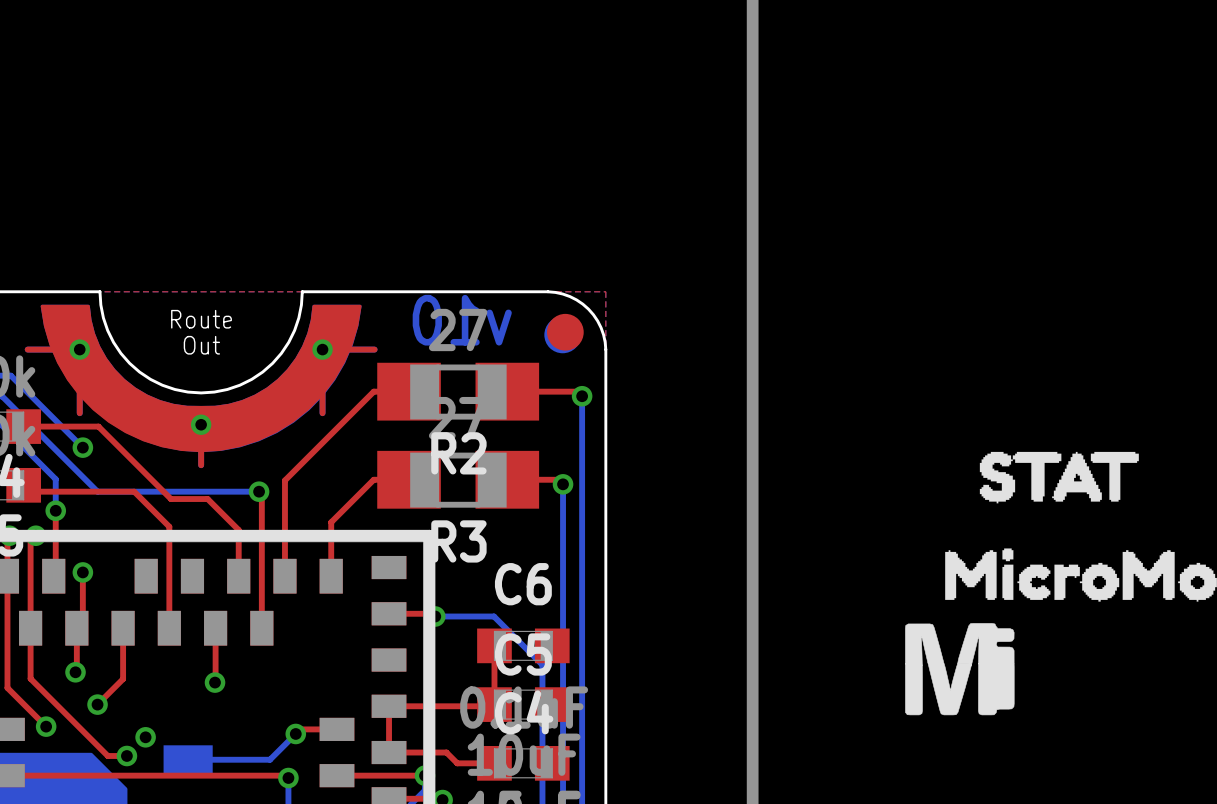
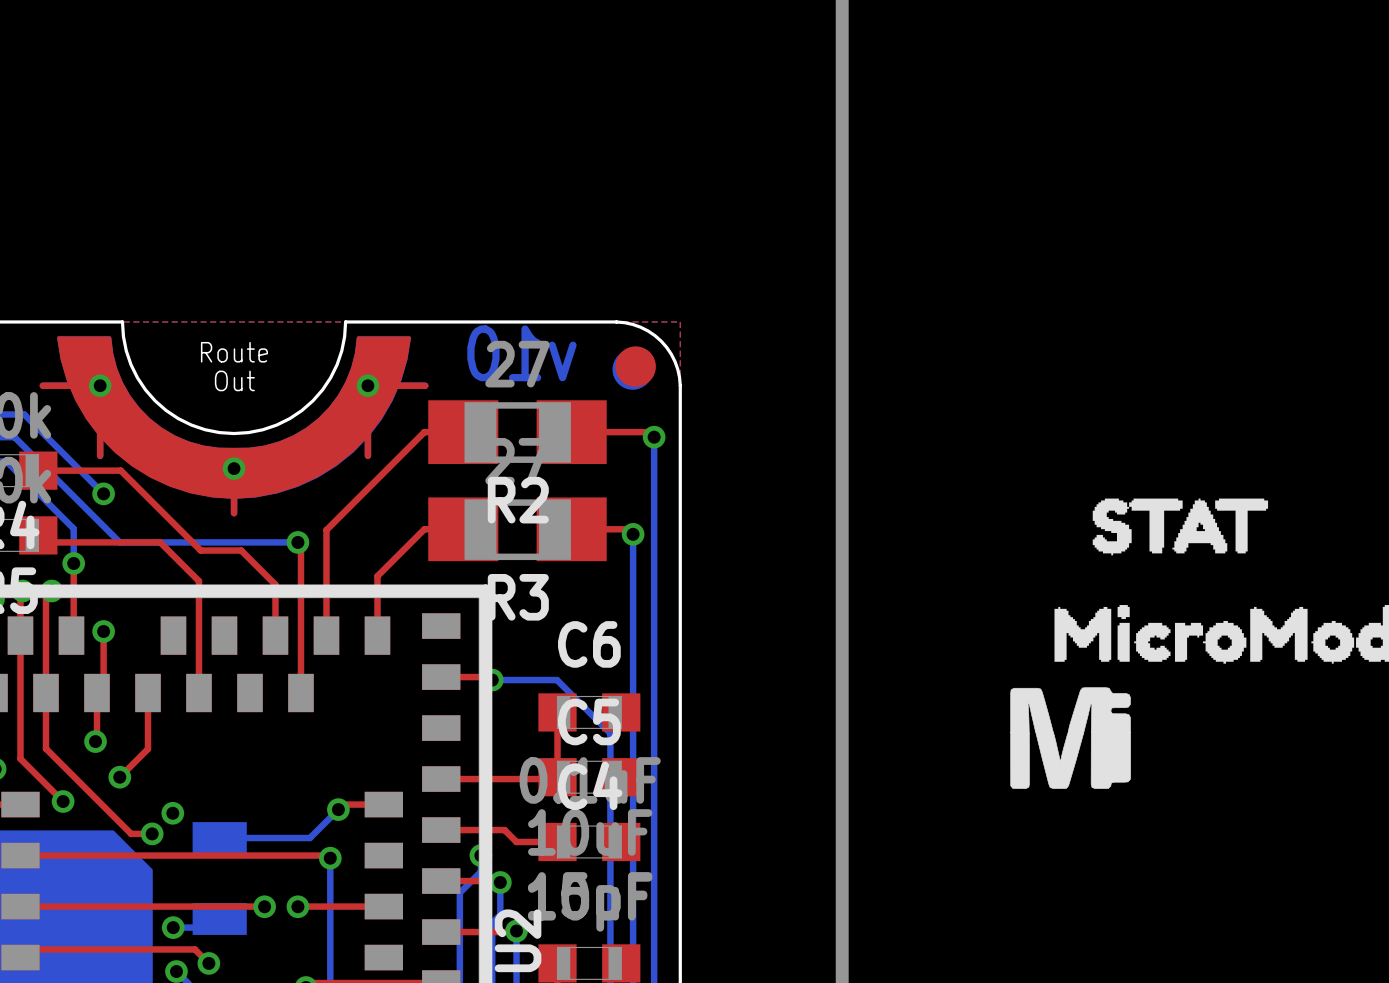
top track: (215, 628) (215, 682) -> none
via: (215, 682) -> none
top track: (389, 706) (389, 752) -> none
top track: (337, 775) (424, 775) -> none

